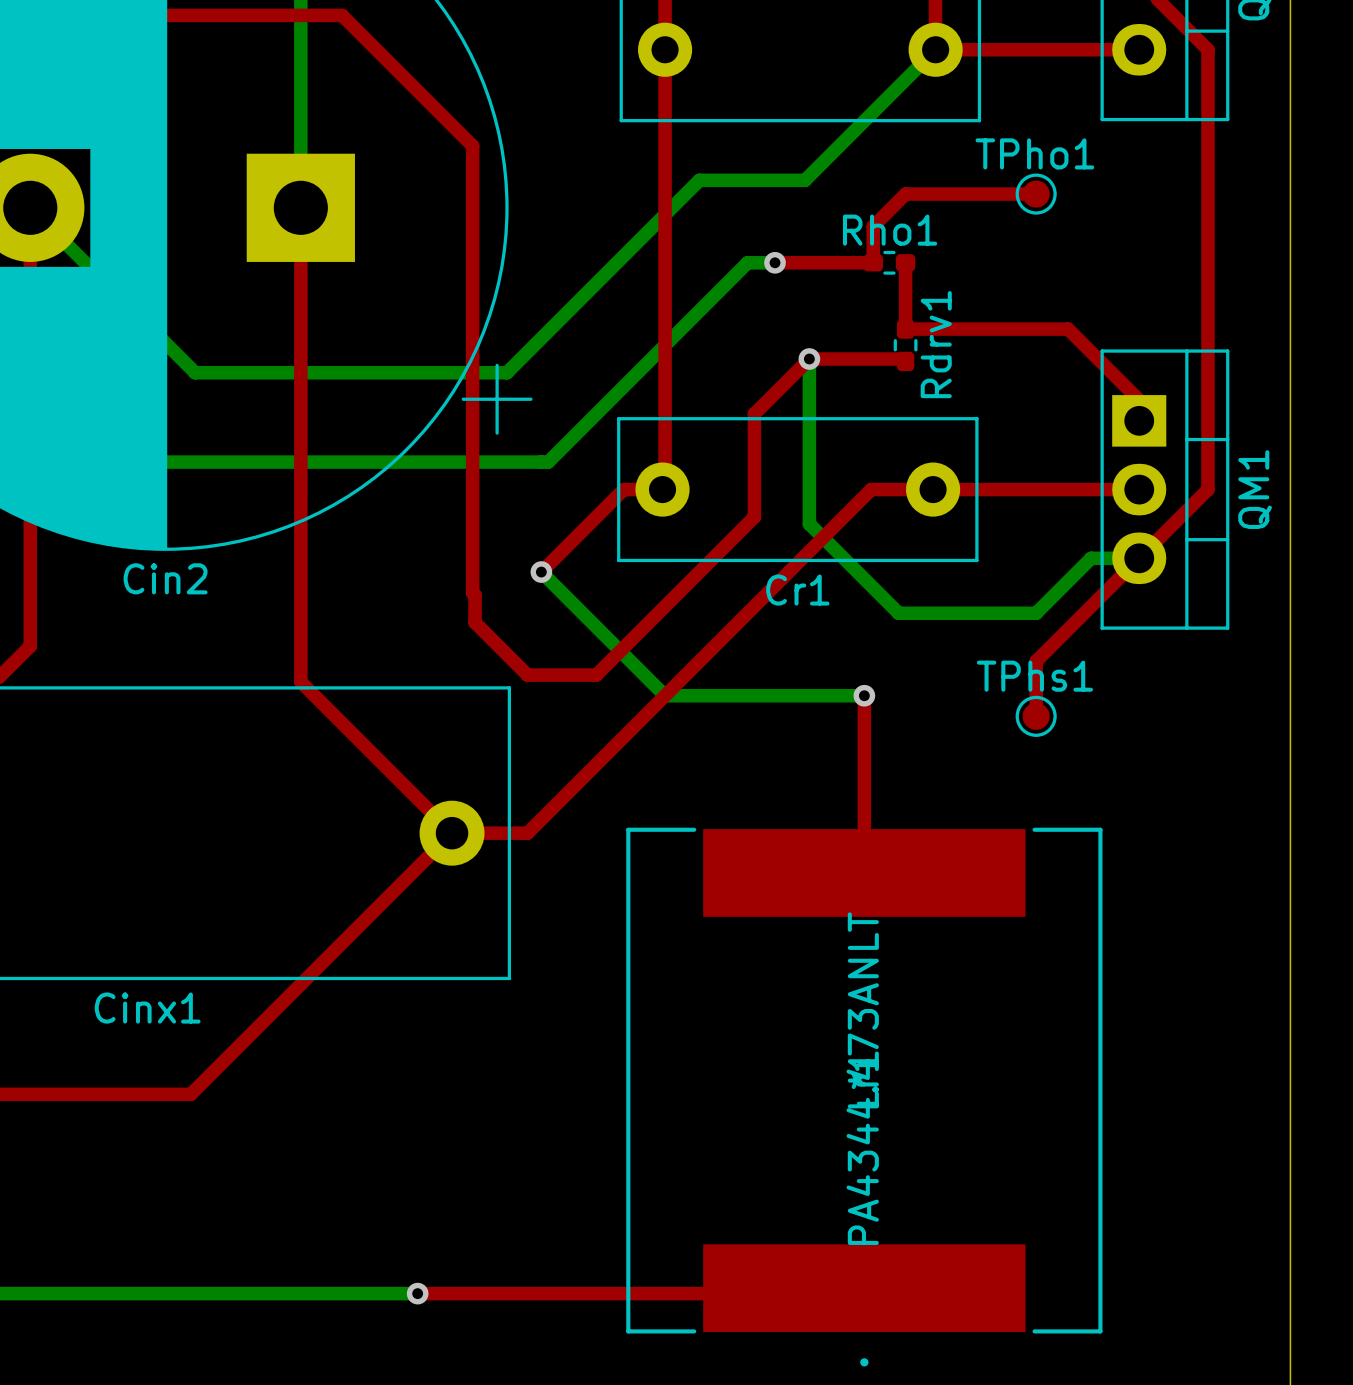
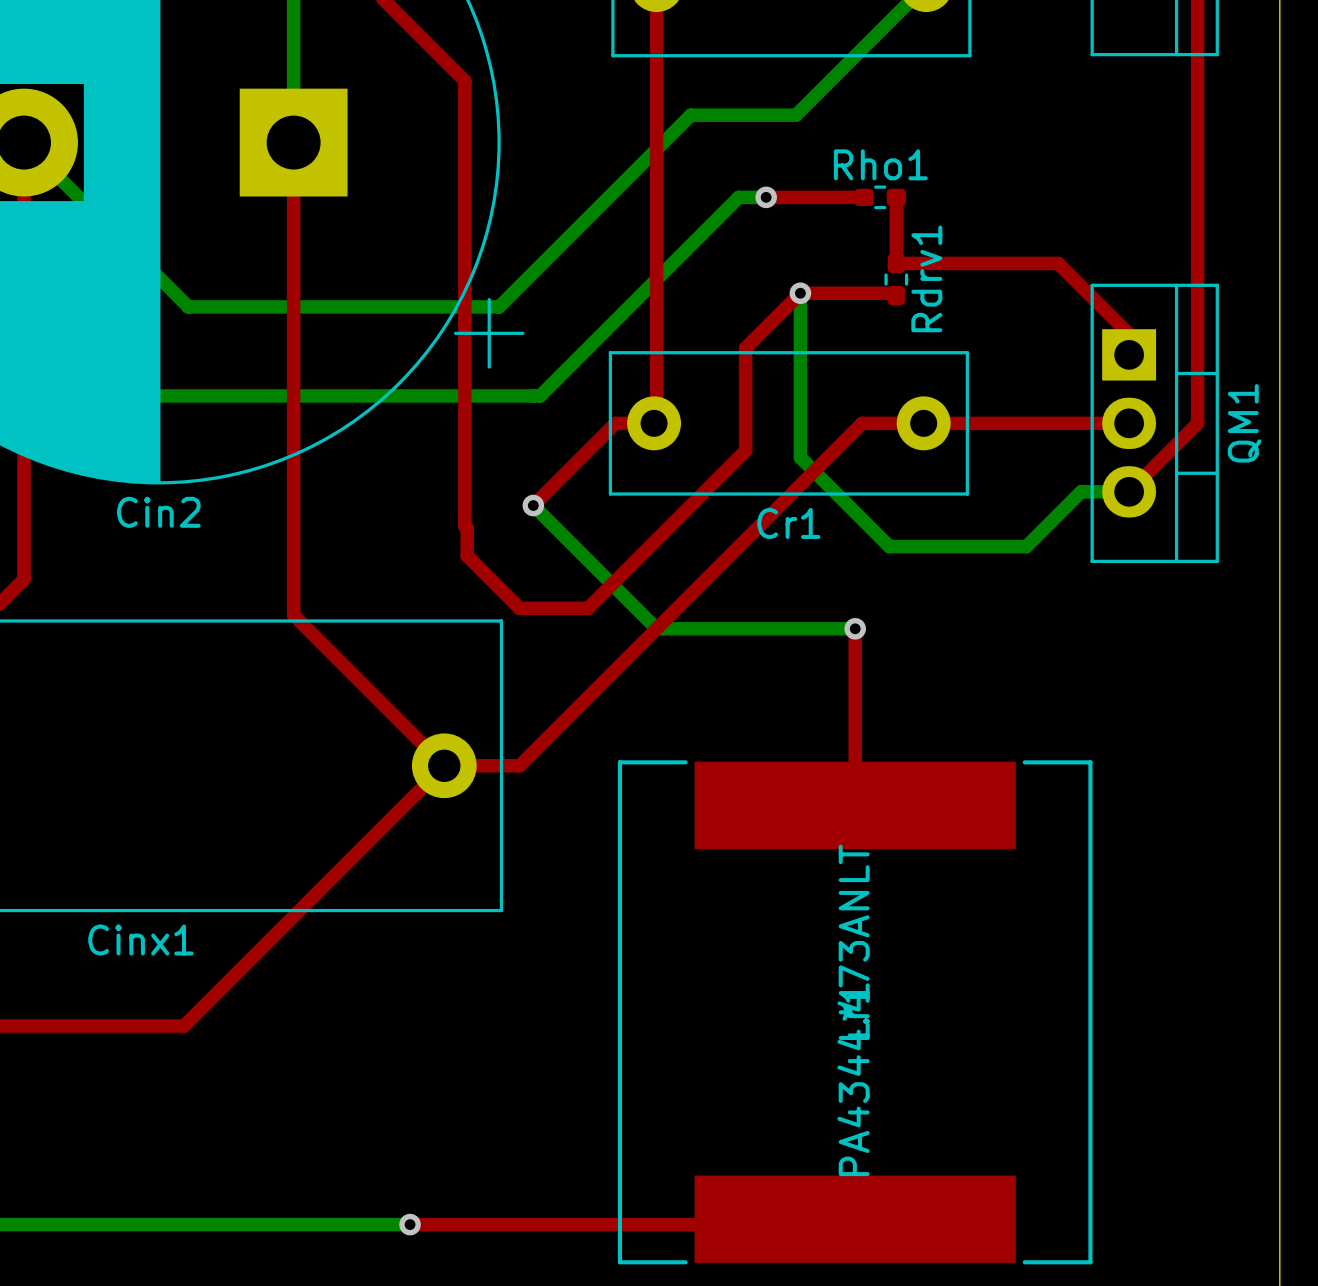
top track: (1036, 194) (905, 194) (873, 226) (873, 262) -> none
TPho1: (1036, 194) -> none
top track: (1139, 558) (1036, 661) (1036, 716) -> none
TPhs1: (1036, 716) -> none

